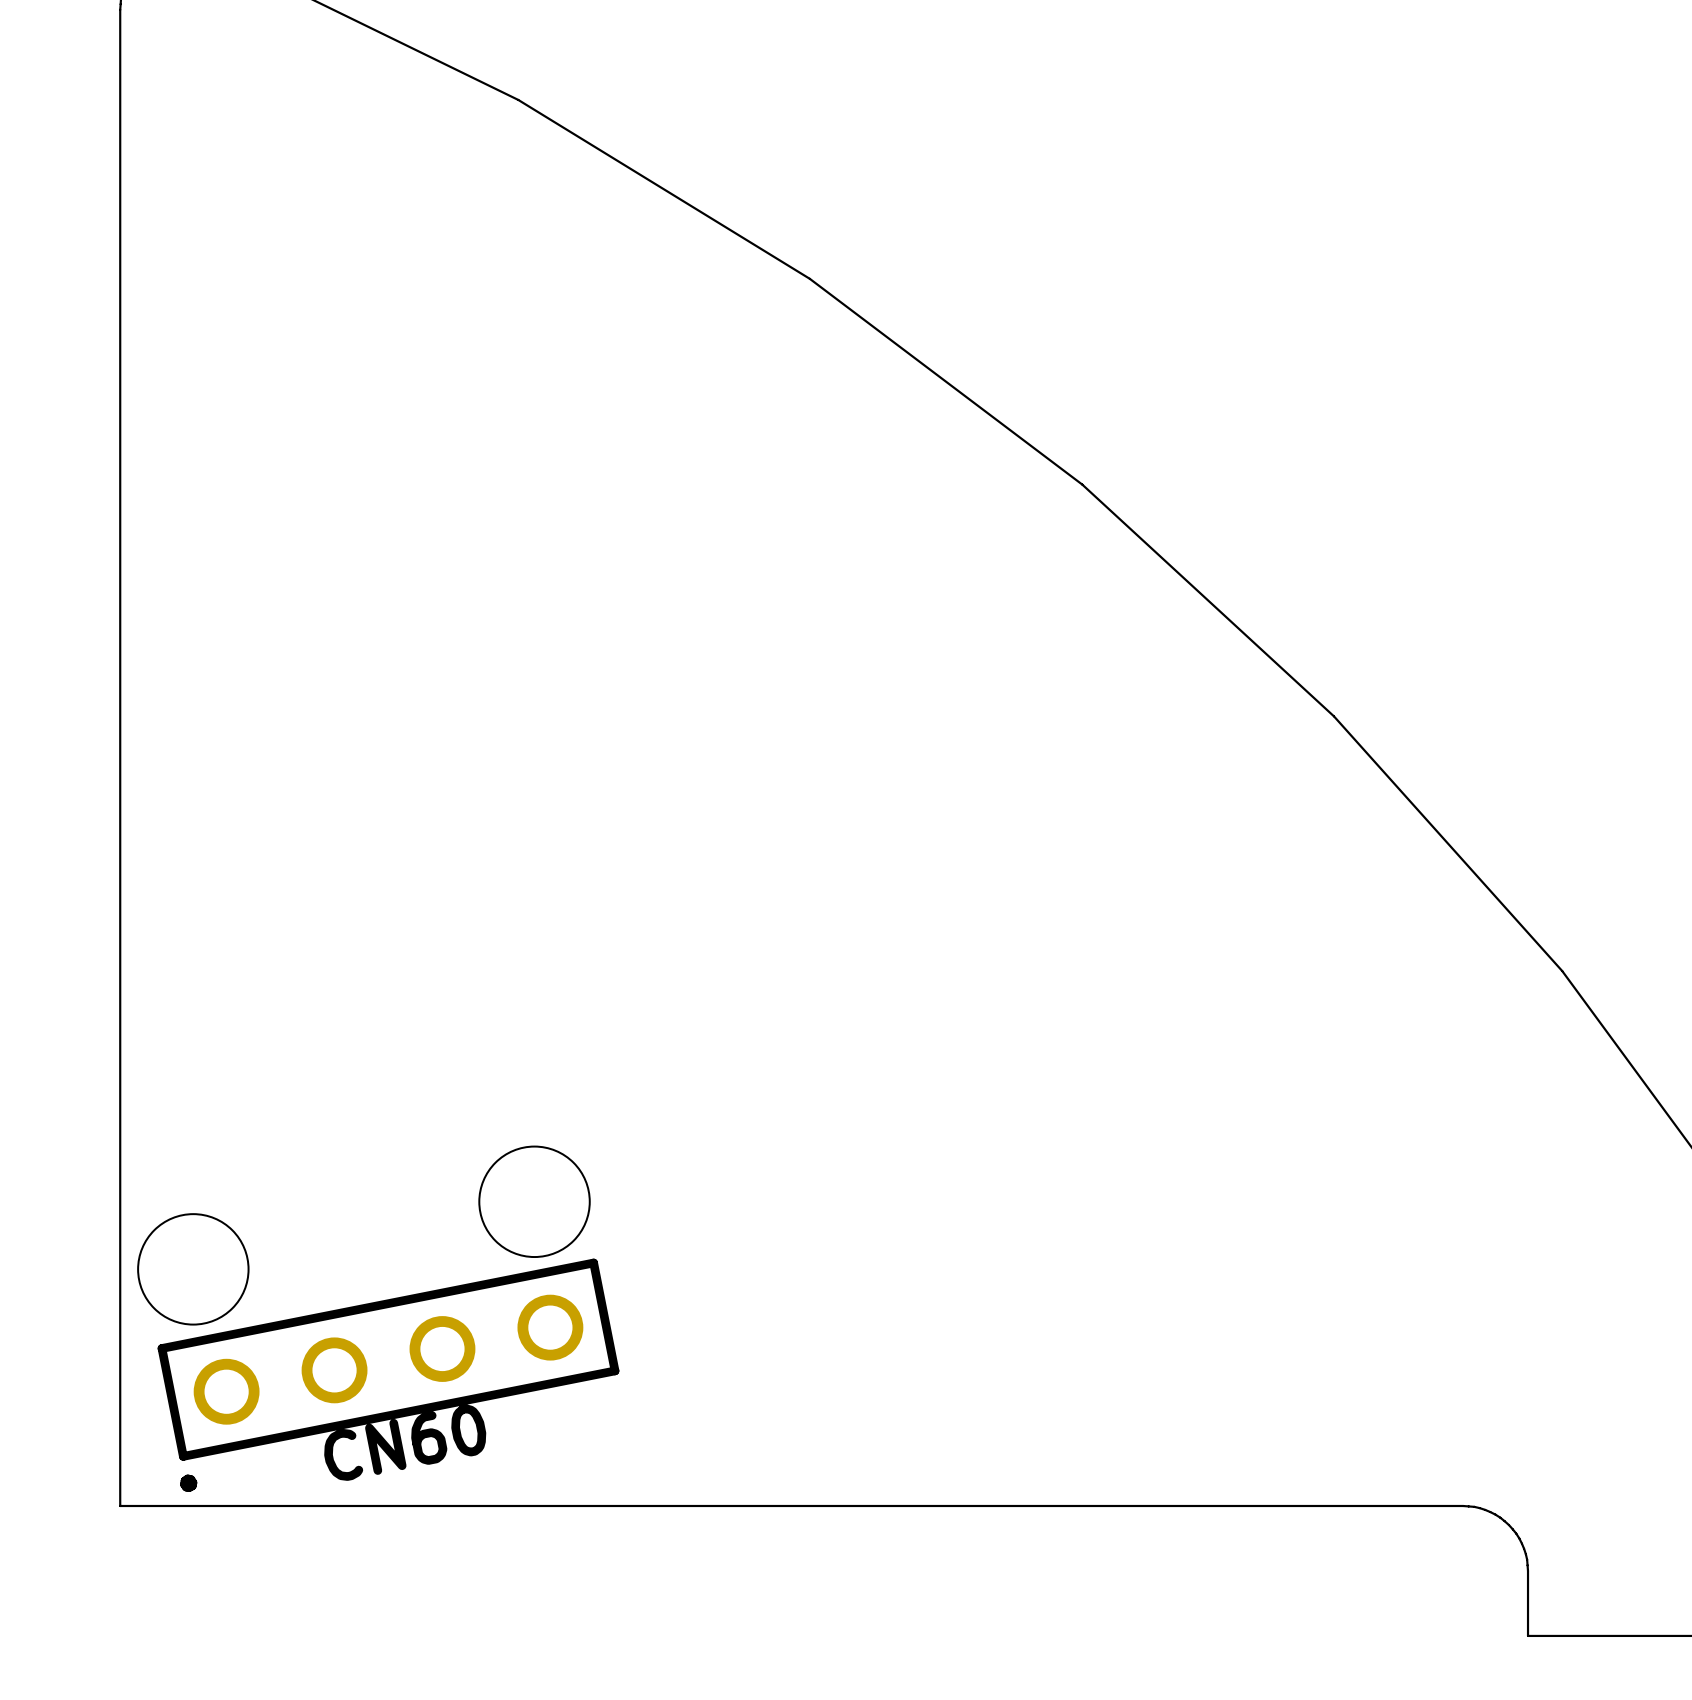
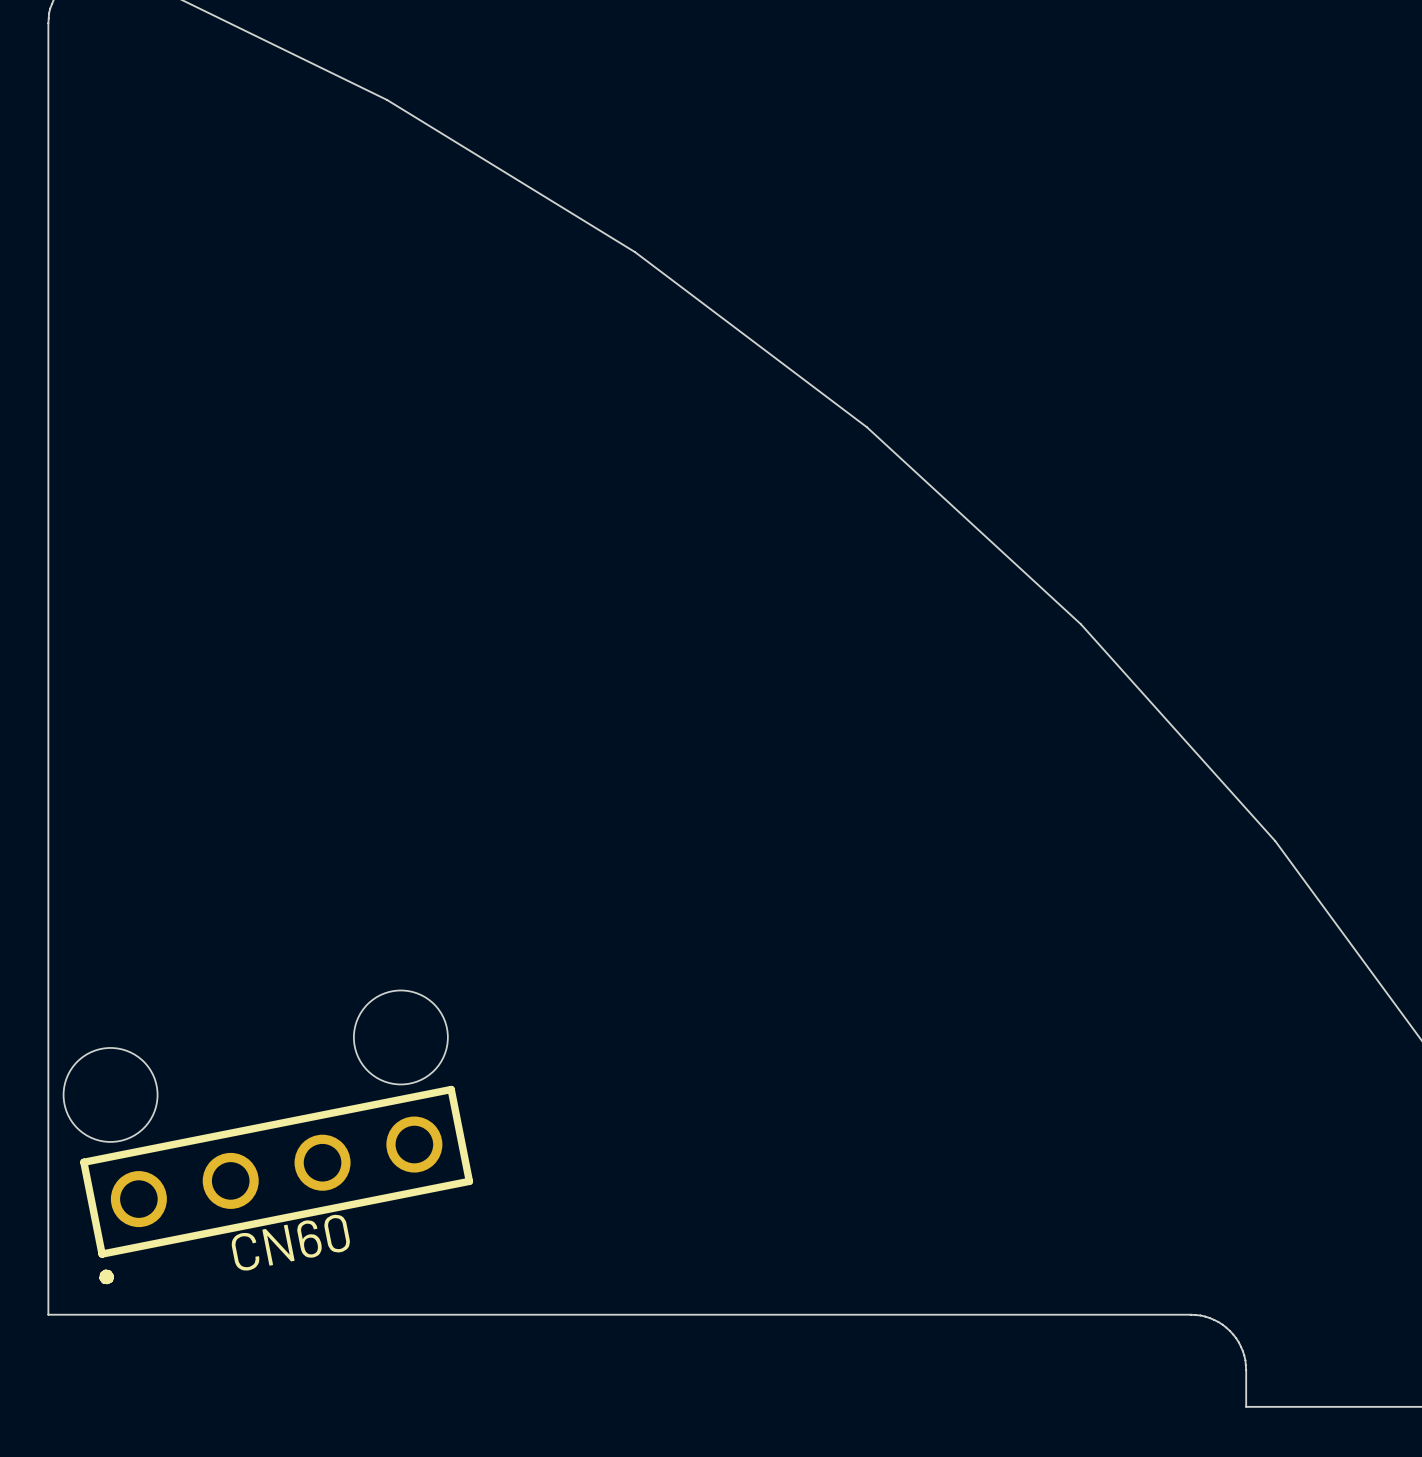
board edge: (120, 1505) (1463, 1505) (1479, 1508) (1495, 1514) (1516, 1533) (1527, 1559) (1528, 1592) -> (48, 1296) (48, 1314) (1190, 1314) (1209, 1318) (1229, 1330) (1242, 1351) (1246, 1370)

